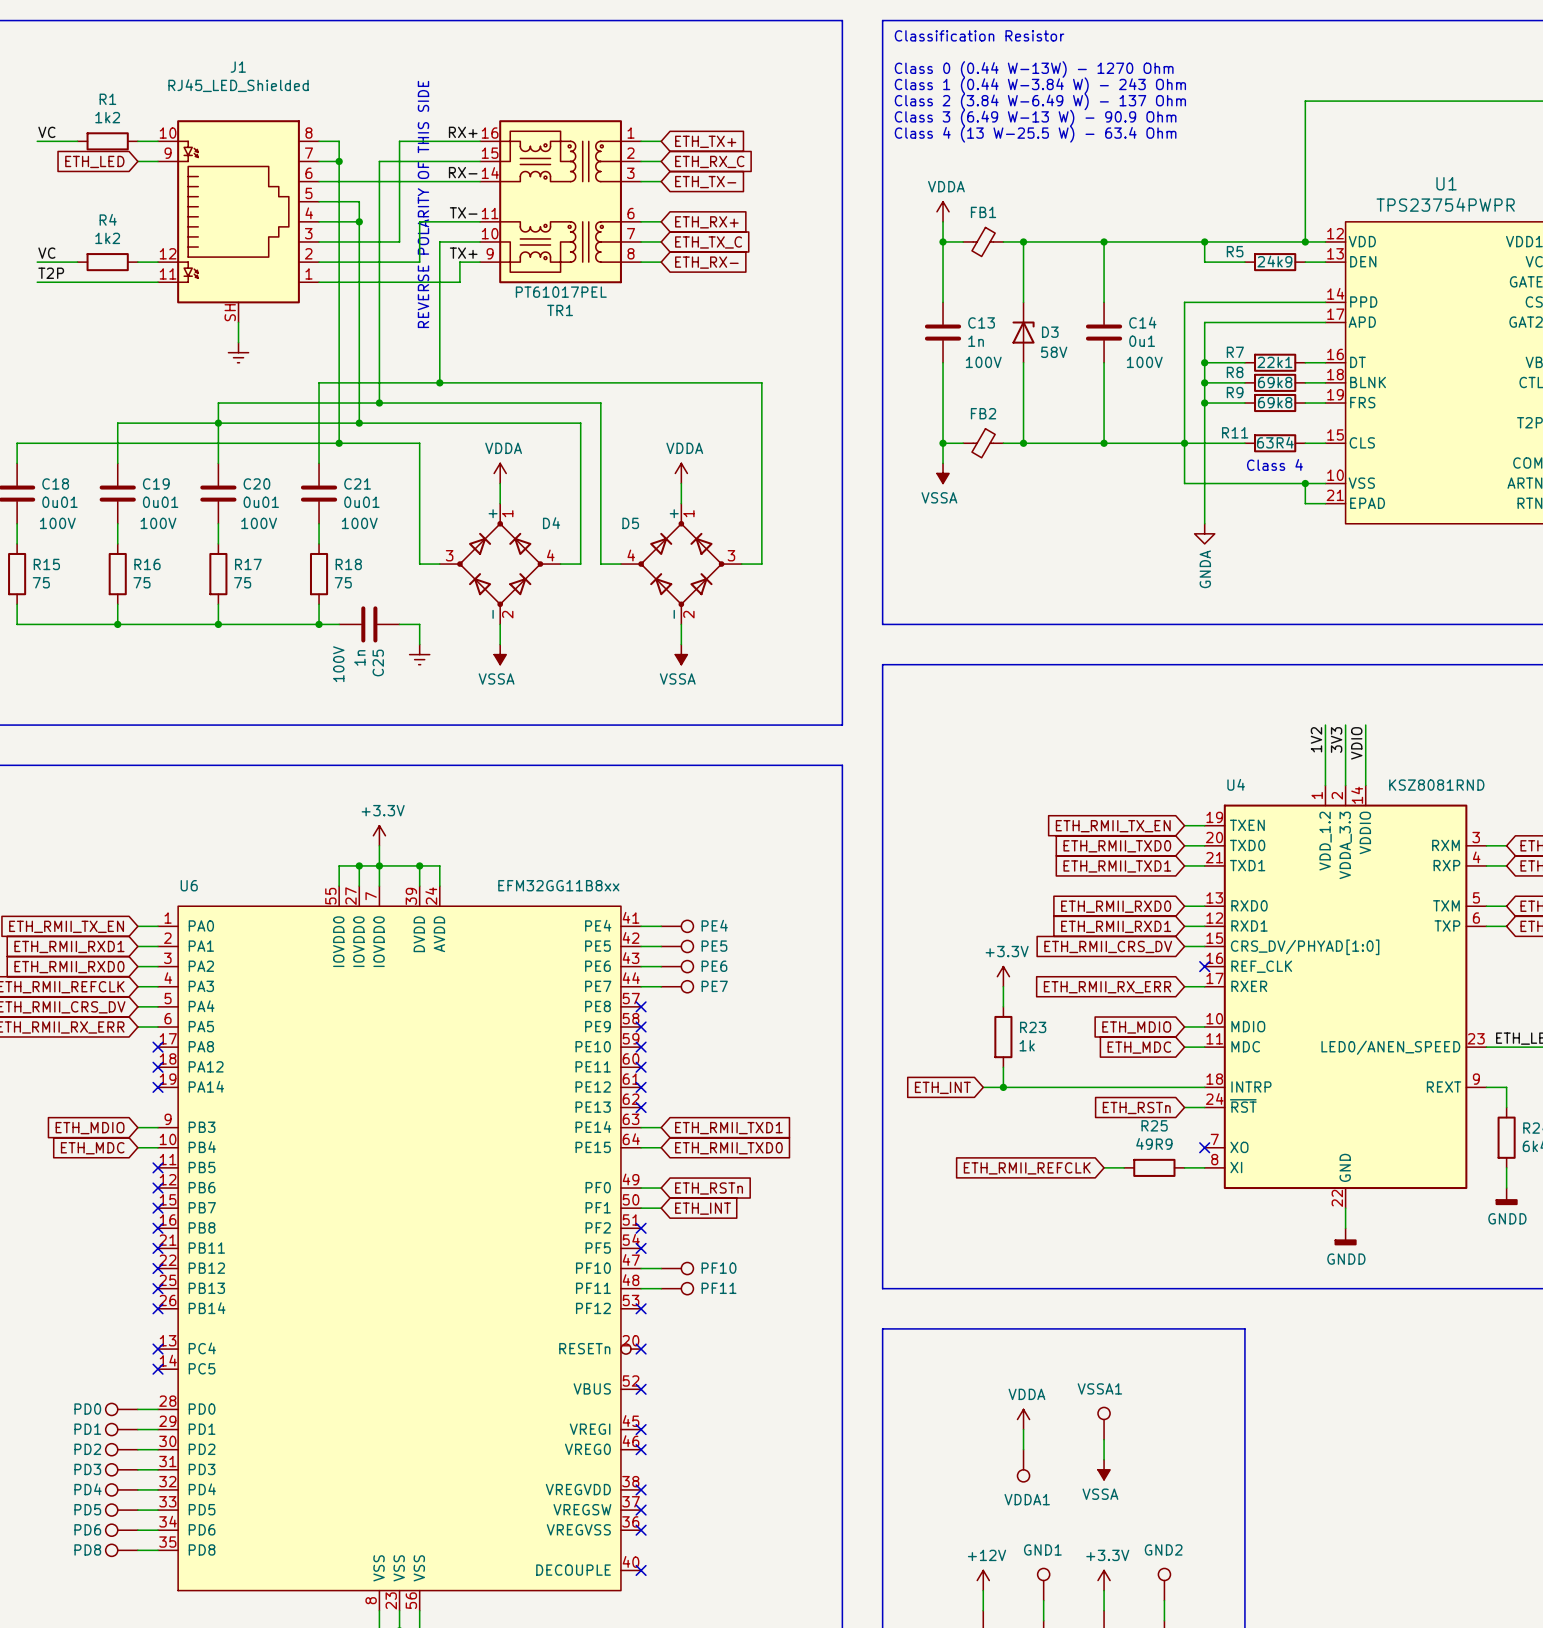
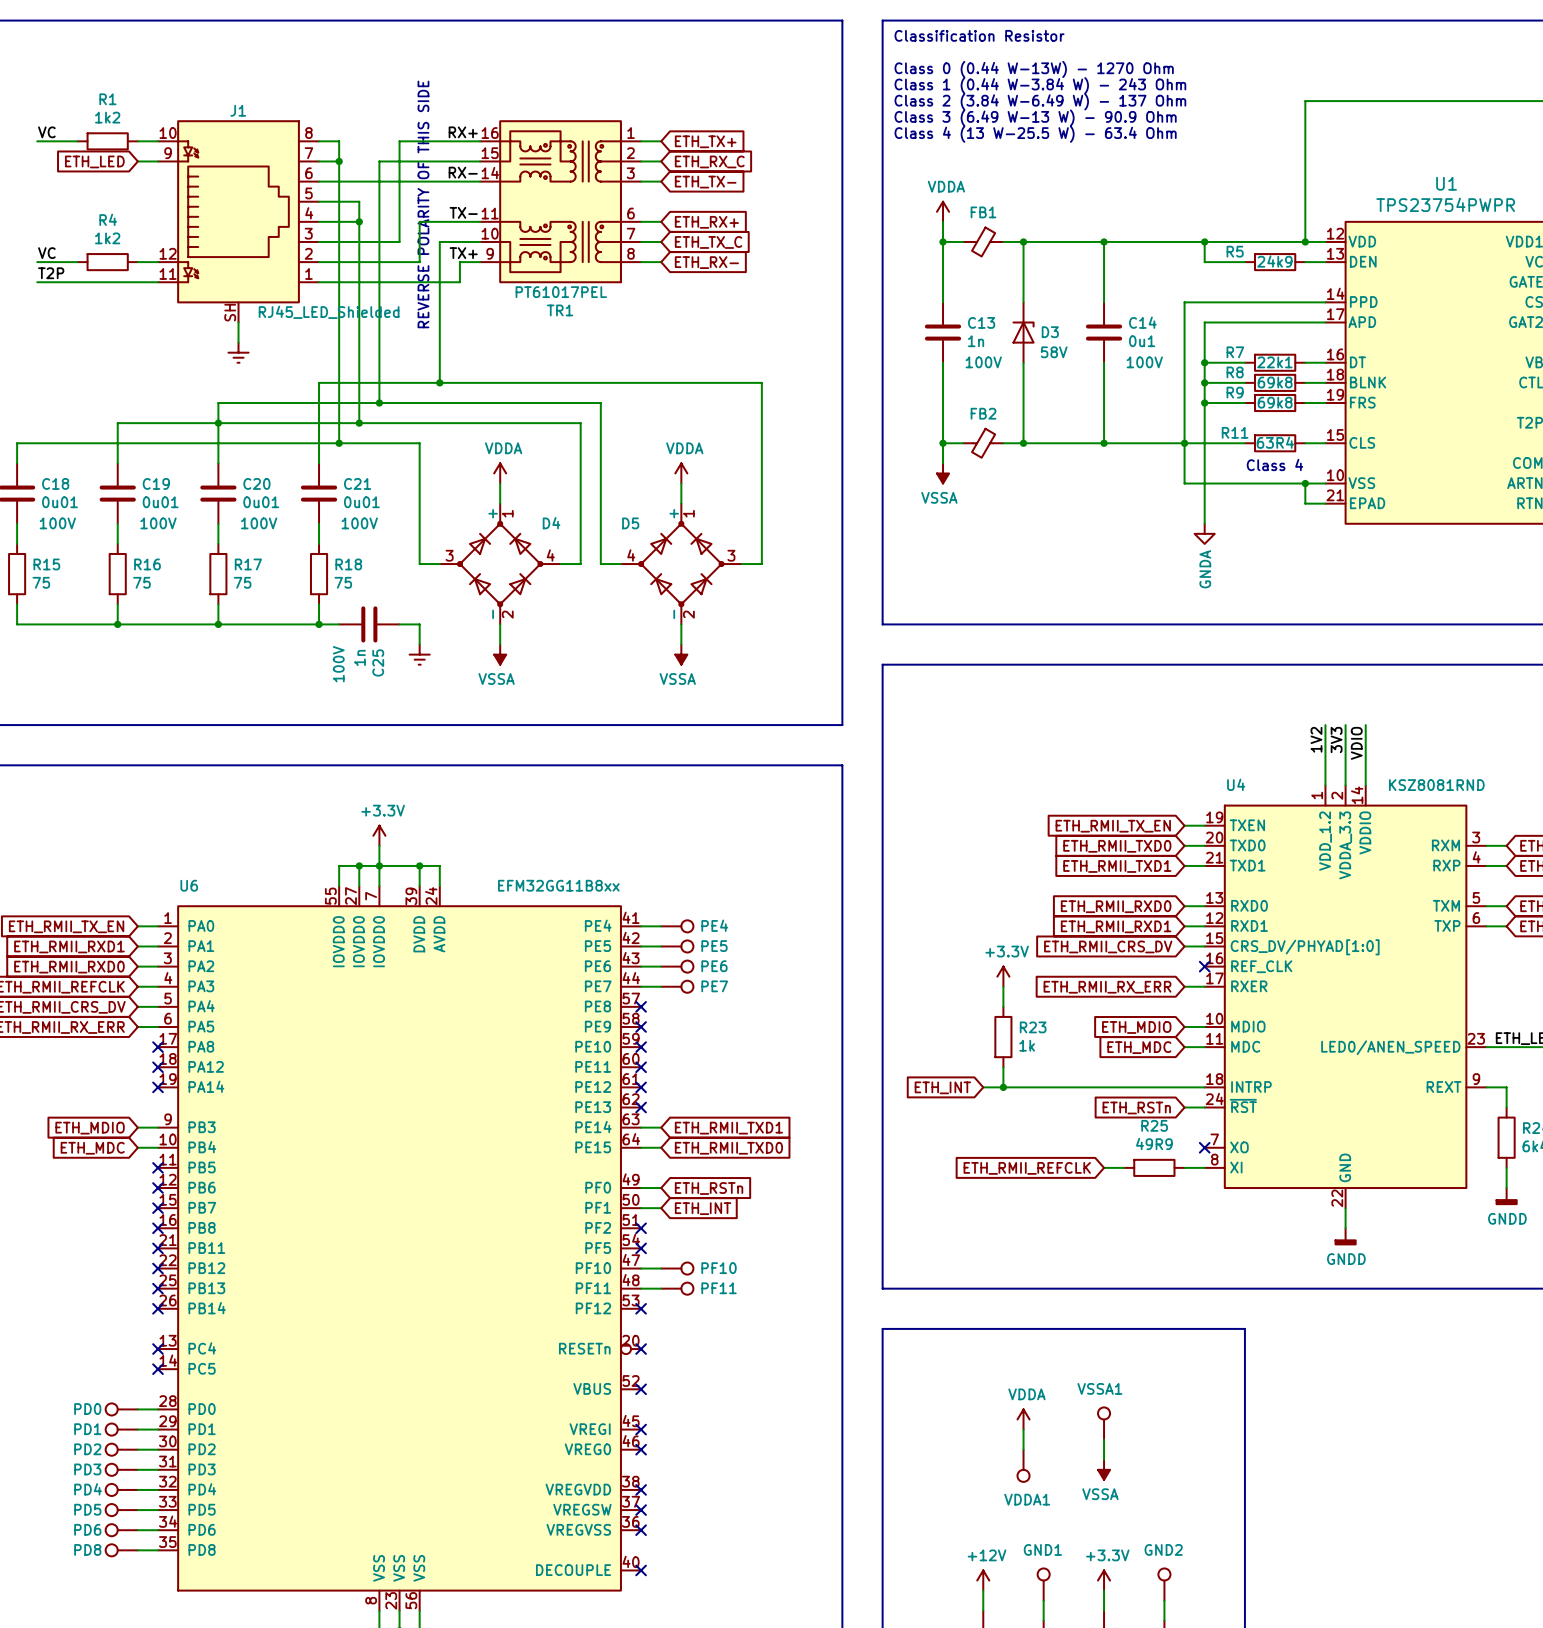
J1 name position: J1 (238, 67) -> J1 (238, 110)
J1 value position: RJ45_LED_Shielded (238, 85) -> RJ45_LED_Shielded (329, 312)

